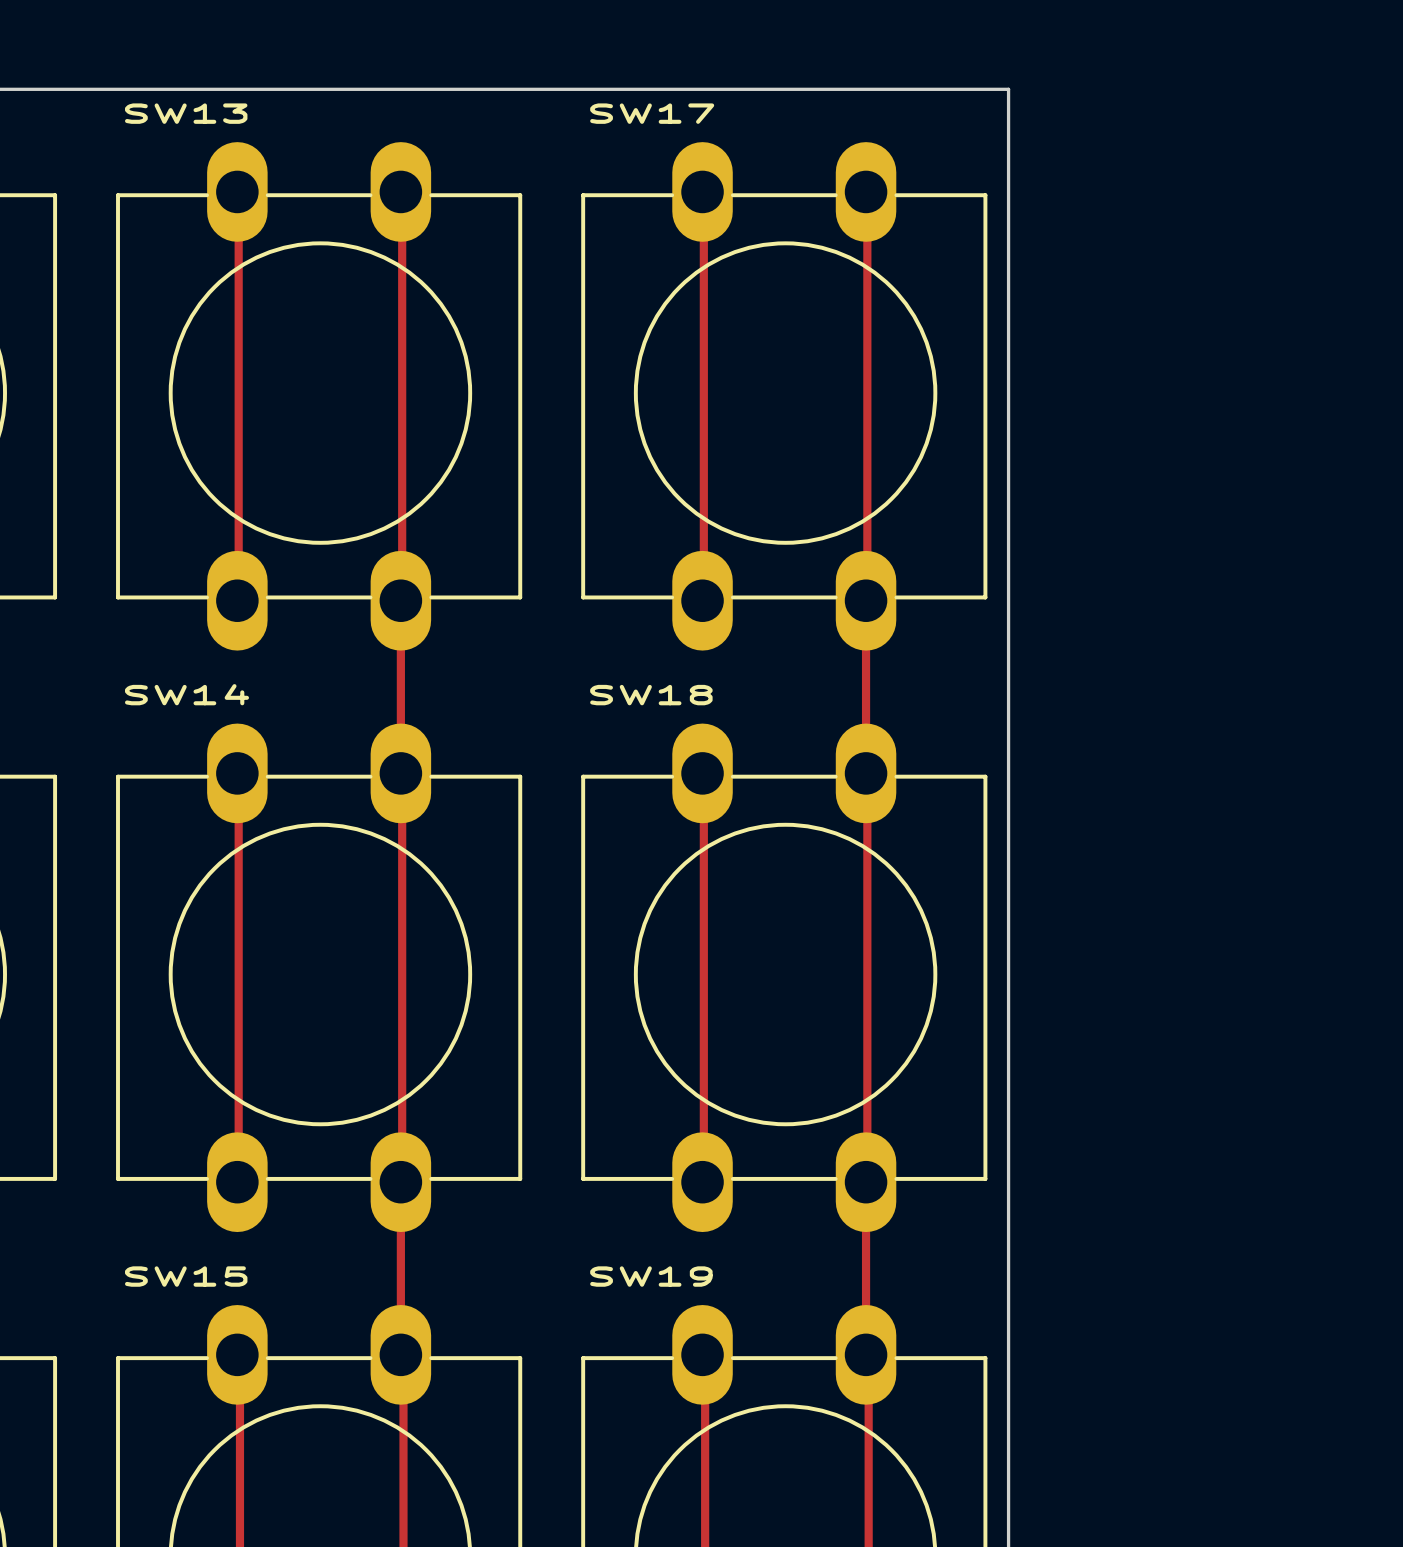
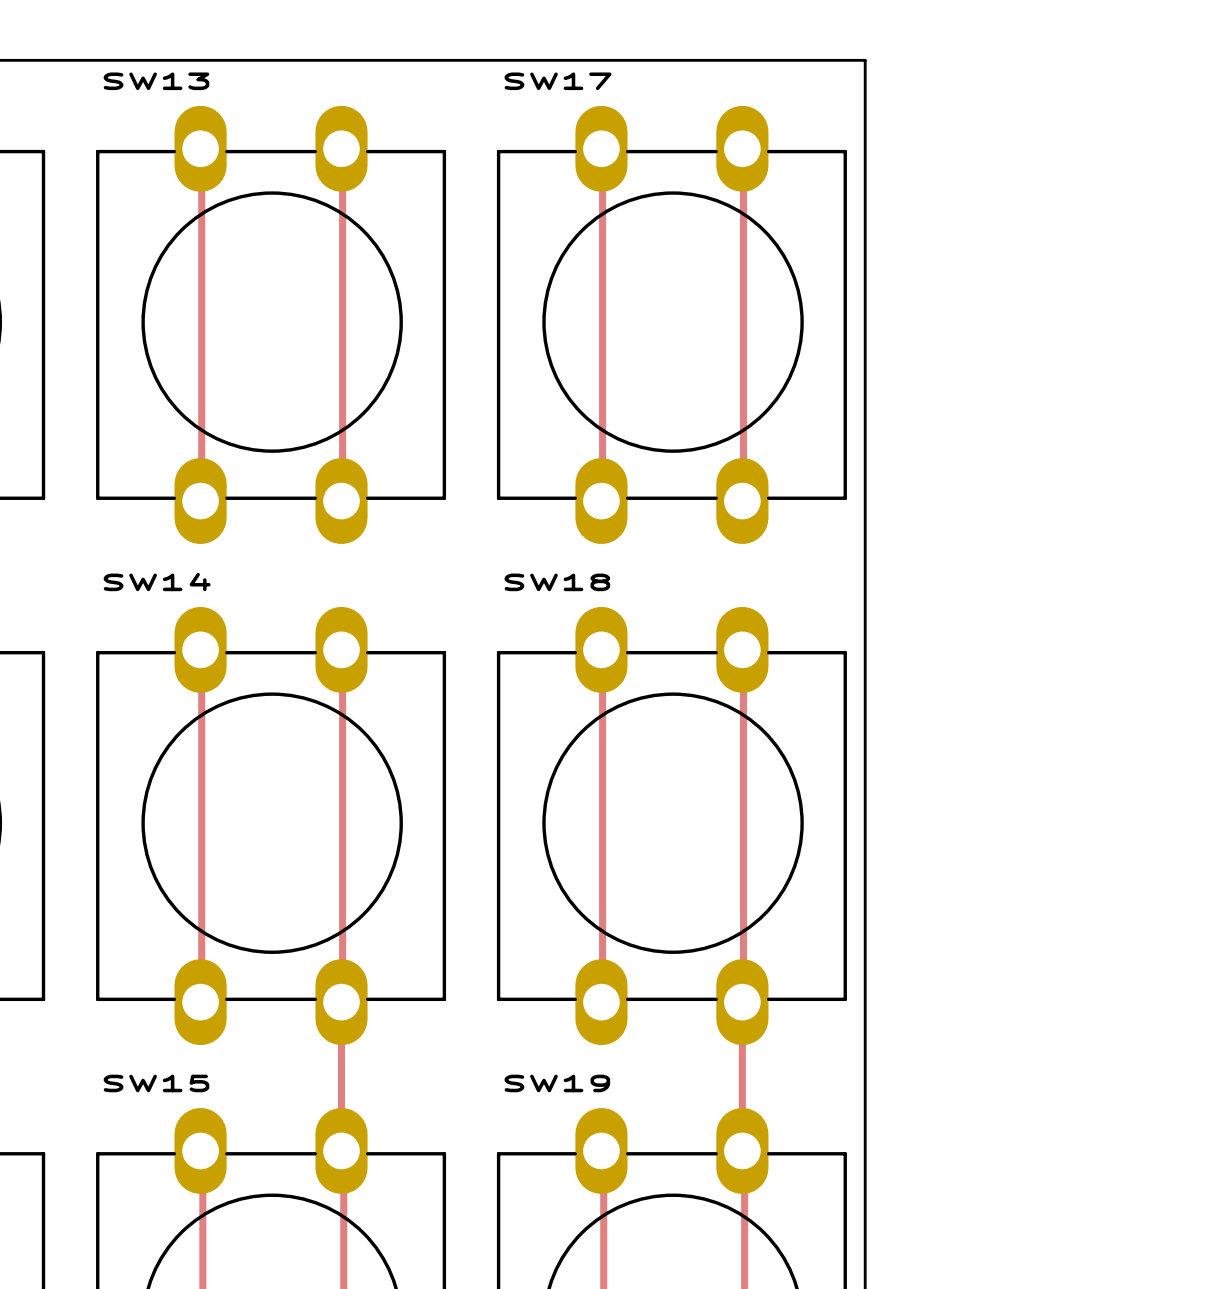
track: (400, 600) (400, 773) -> none
track: (866, 600) (866, 773) -> none

